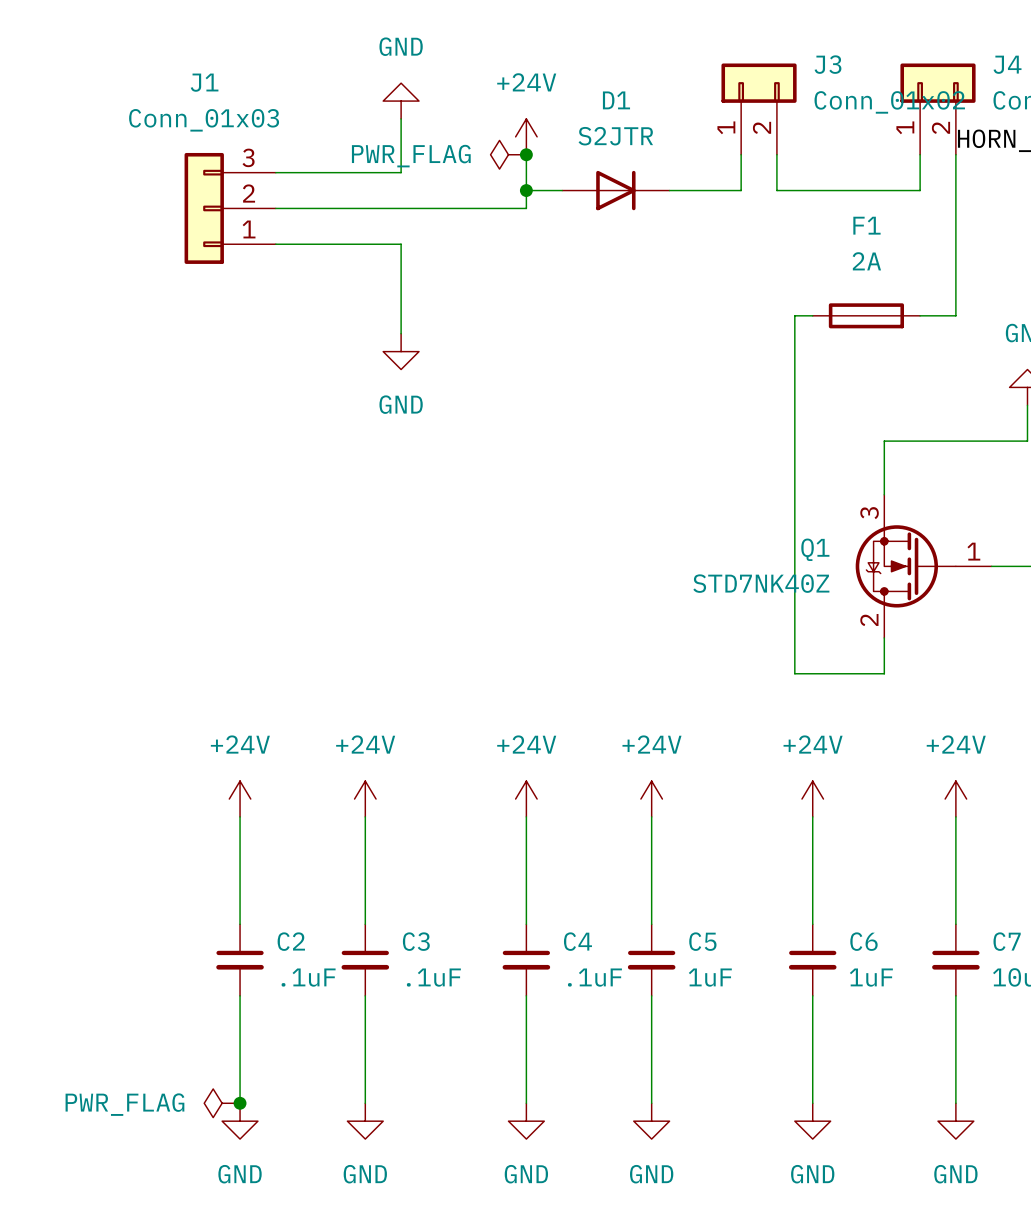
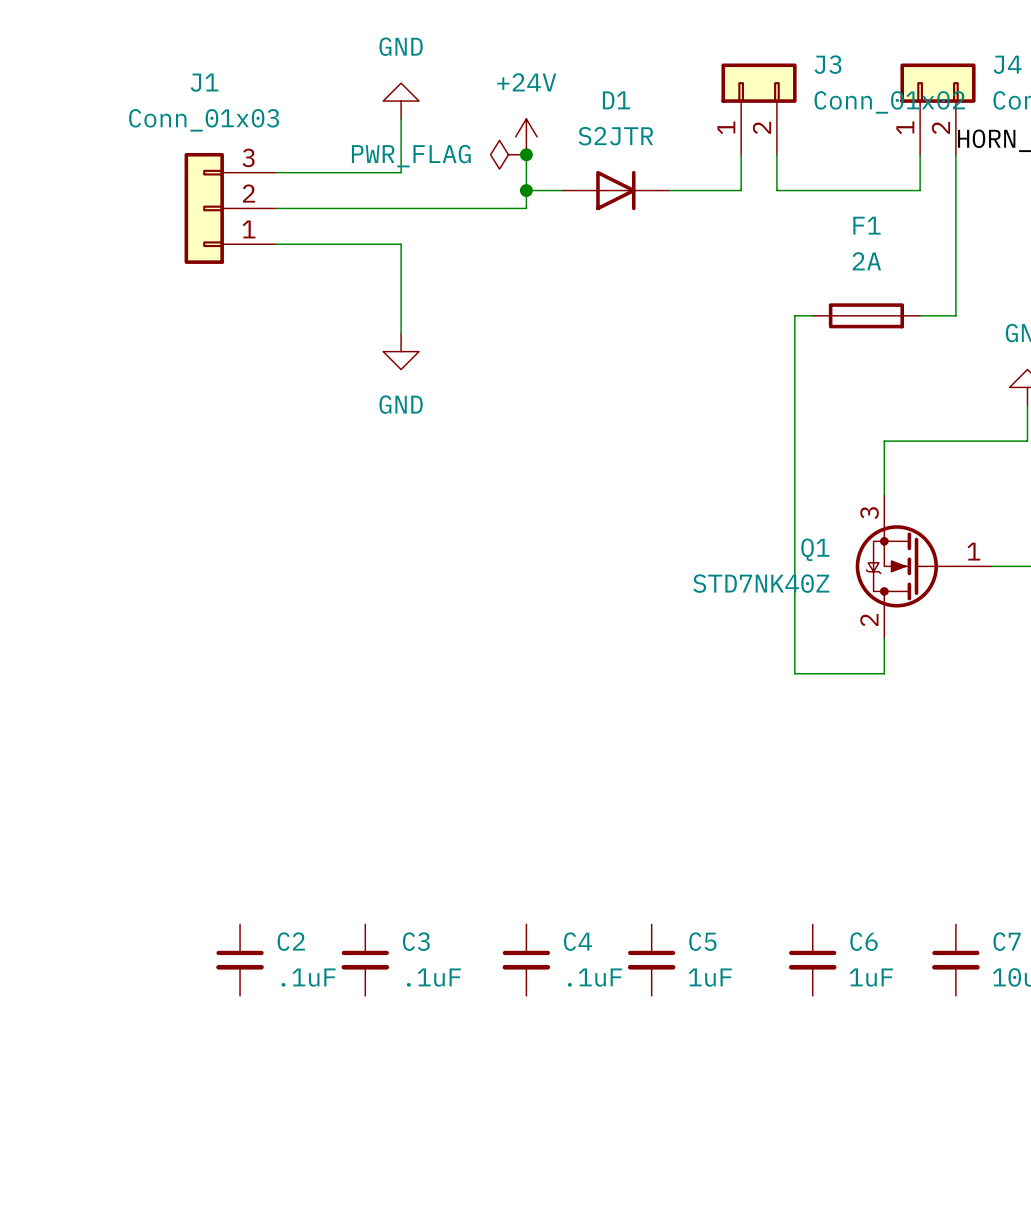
power symbol: +24V (240, 799) -> none
power symbol: +24V (365, 799) -> none
power symbol: +24V (526, 799) -> none
power symbol: +24V (651, 799) -> none
power symbol: +24V (812, 799) -> none
power symbol: +24V (955, 799) -> none
wire: (240, 816) (240, 924) -> none
wire: (365, 816) (365, 924) -> none
wire: (526, 816) (526, 924) -> none
wire: (651, 816) (651, 924) -> none
wire: (812, 816) (812, 924) -> none
wire: (955, 816) (955, 924) -> none
wire: (240, 995) (240, 1103) -> none
wire: (365, 995) (365, 1103) -> none
wire: (526, 995) (526, 1103) -> none
wire: (651, 995) (651, 1103) -> none
wire: (812, 995) (812, 1103) -> none
wire: (955, 995) (955, 1103) -> none
power symbol: PWR_FLAG (222, 1103) -> none
junction: (240, 1103) -> none
power symbol: GND (240, 1121) -> none
power symbol: GND (365, 1121) -> none
power symbol: GND (526, 1121) -> none
power symbol: GND (651, 1121) -> none
power symbol: GND (812, 1121) -> none
power symbol: GND (955, 1121) -> none

